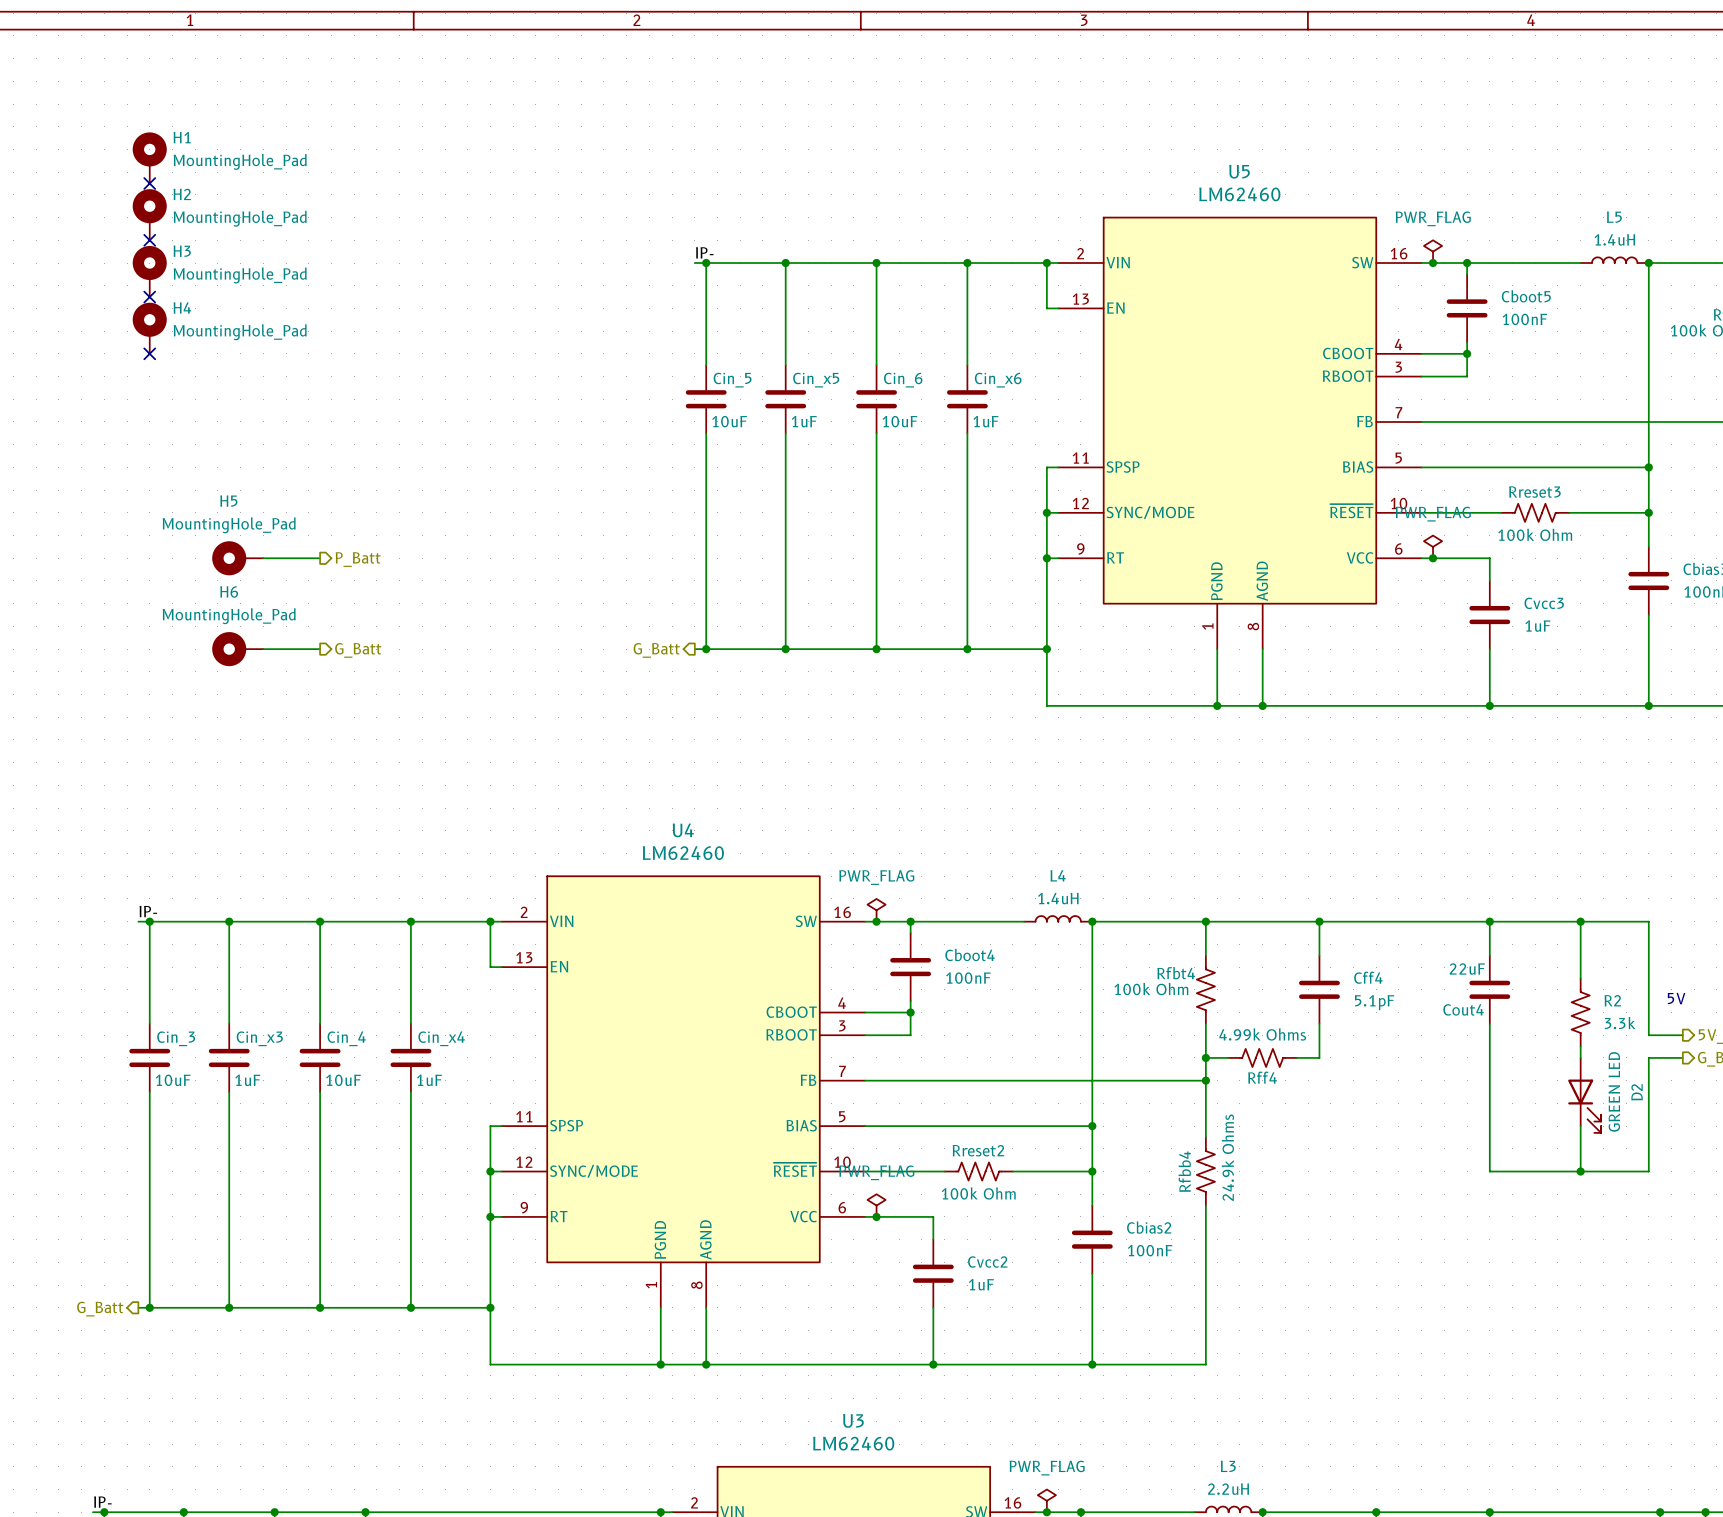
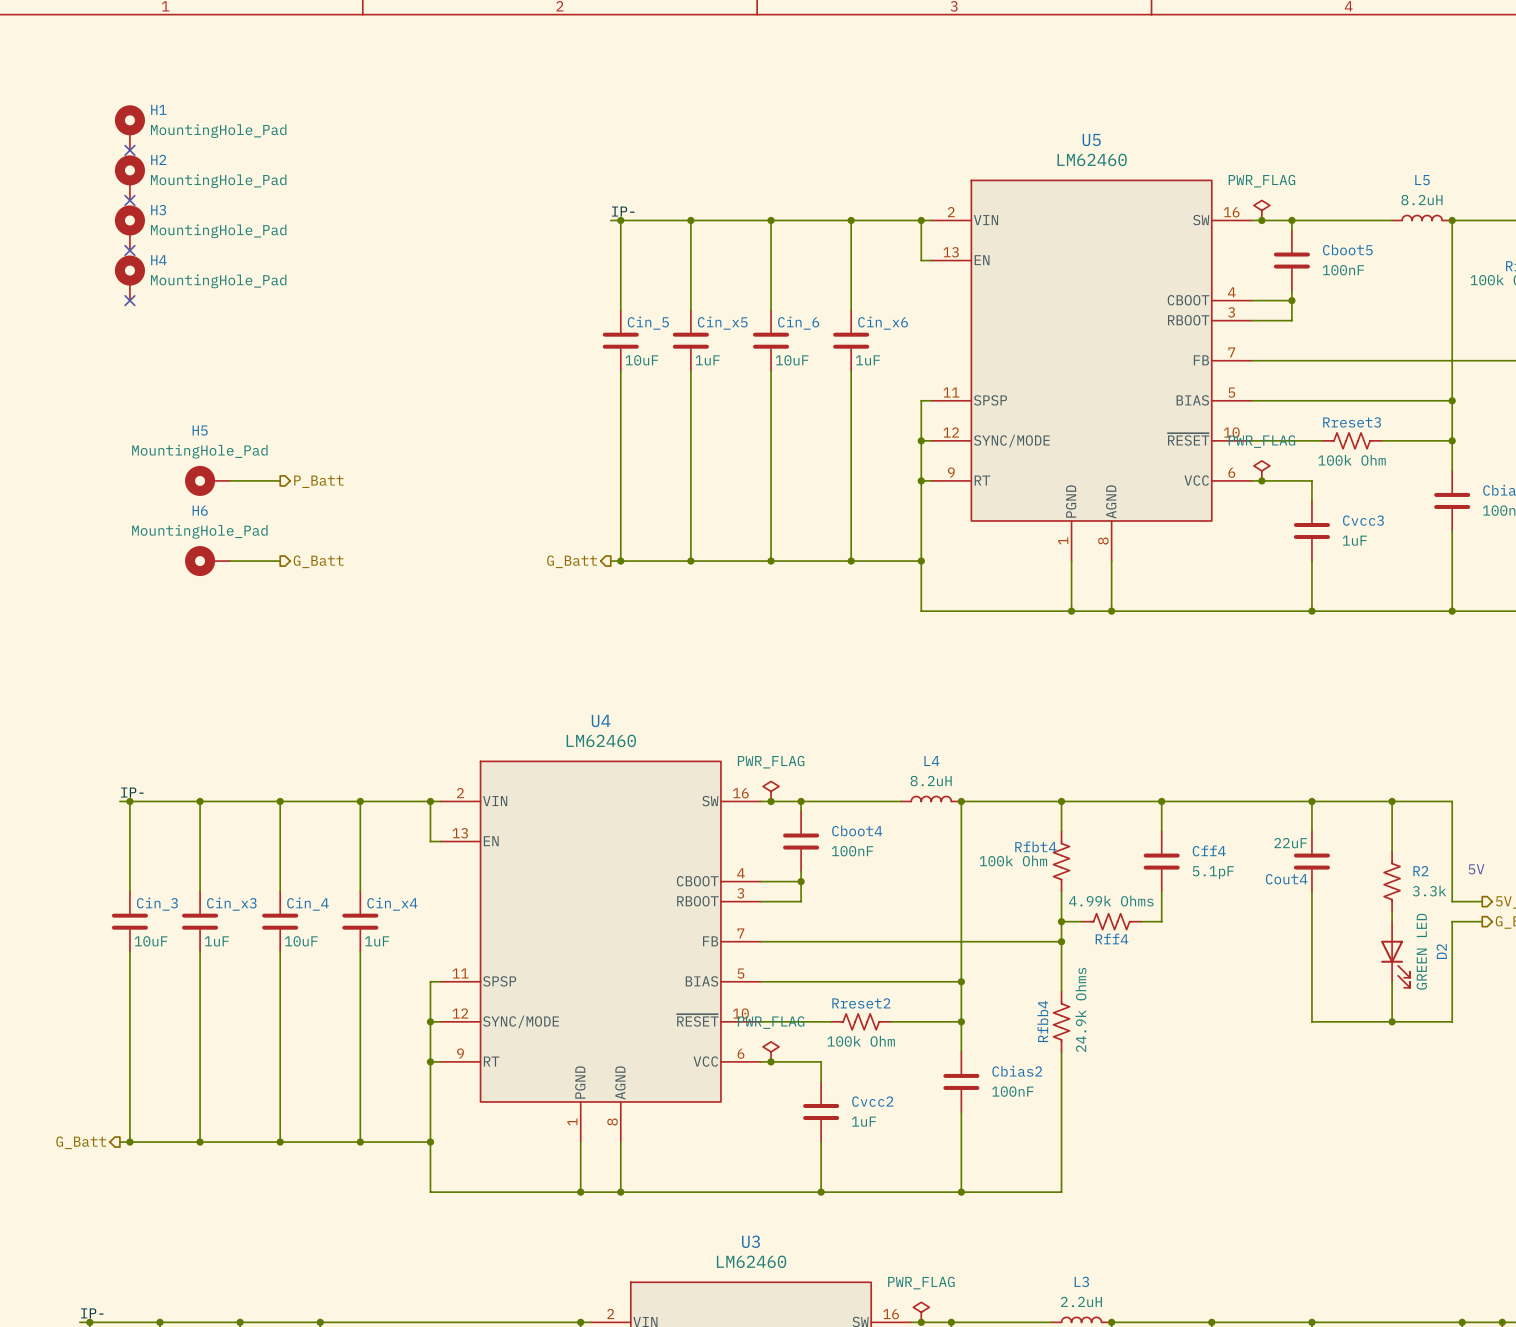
L5 value: 1.4uH (1614, 239) -> 8.2uH (1421, 200)
L4 value: 1.4uH (1058, 898) -> 8.2uH (931, 781)

